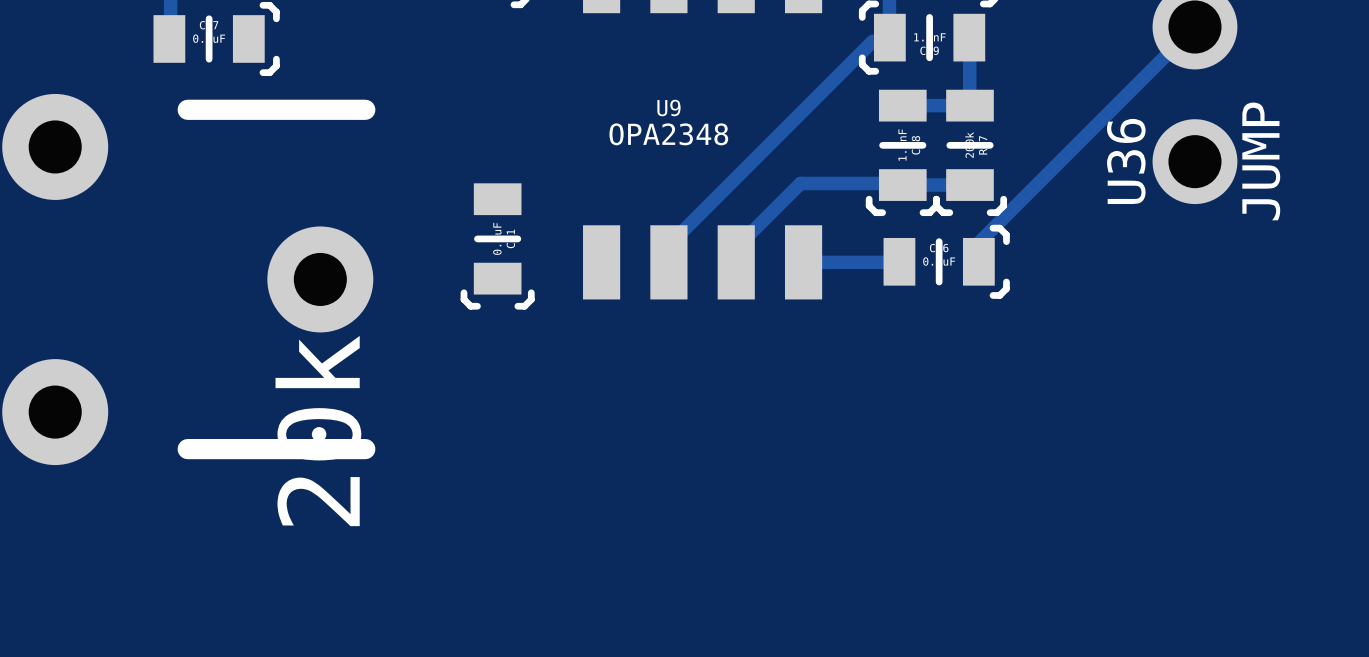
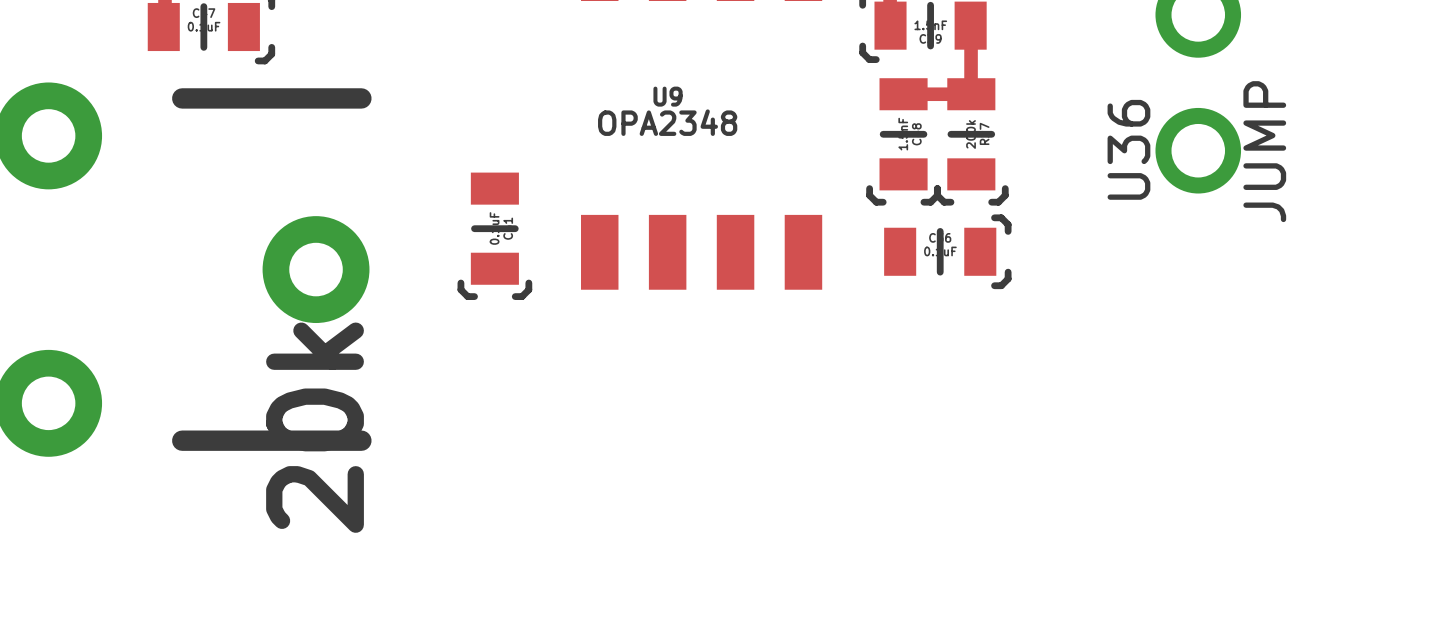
track: (1194, 26) (978, 243) (978, 261) -> none
track: (872, 41) (668, 245) (668, 262) -> none
track: (969, 185) (800, 183) (735, 247) (735, 262) -> none
track: (803, 262) (898, 262) -> none

